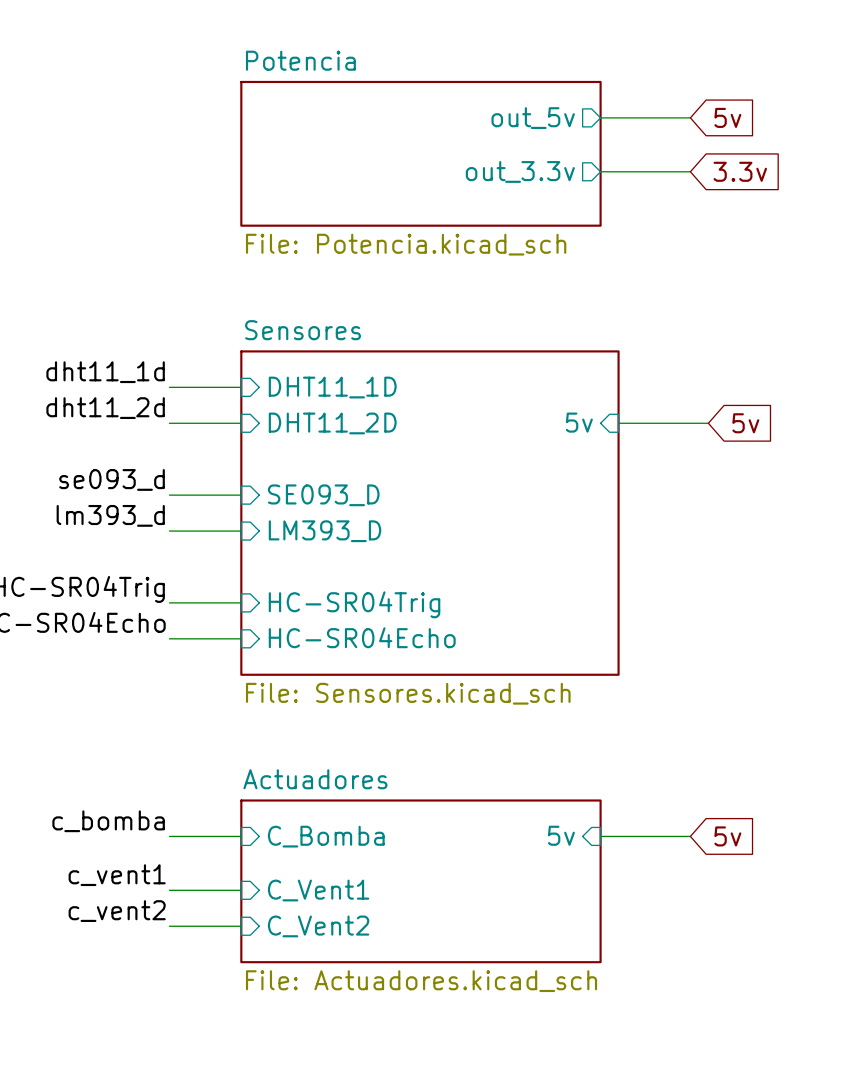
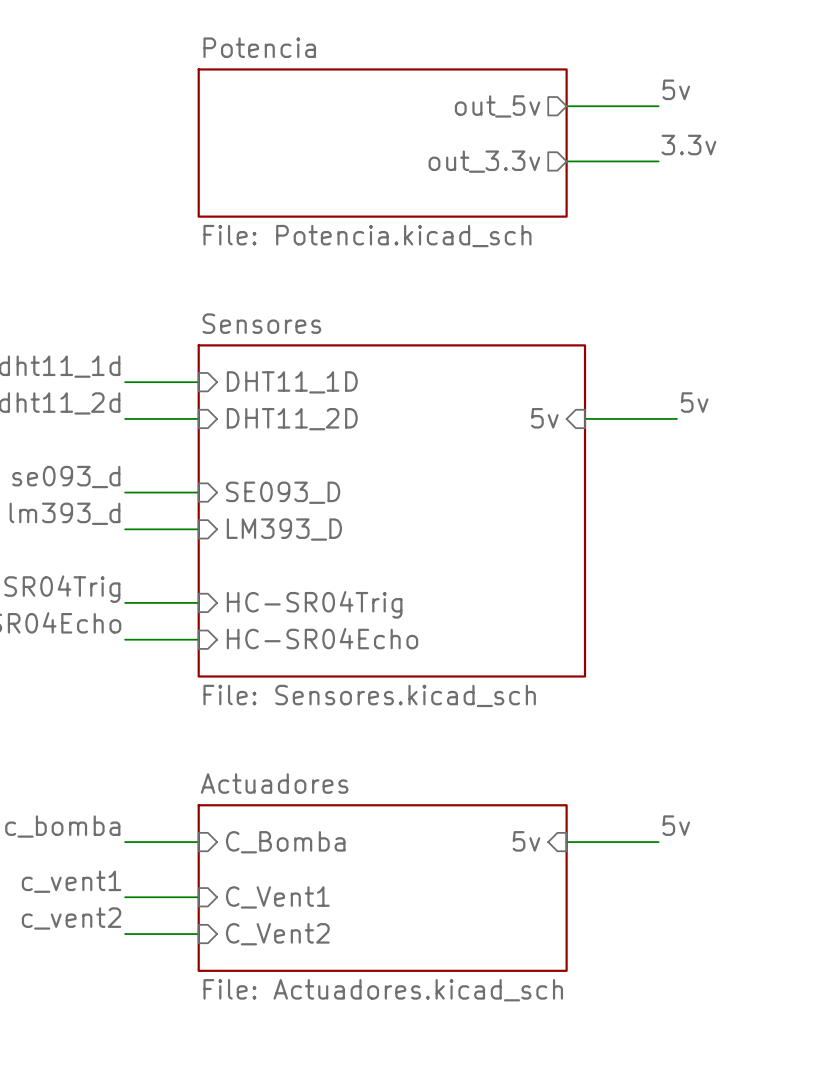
label: none -> 5v (676, 89)
global label: 5v (727, 117) -> none
label: none -> 3.3v (688, 145)
global label: 3.3v (740, 171) -> none
label: none -> 5v (694, 402)
global label: 5v (745, 423) -> none
label: none -> 5v (676, 825)
global label: 5v (727, 836) -> none

